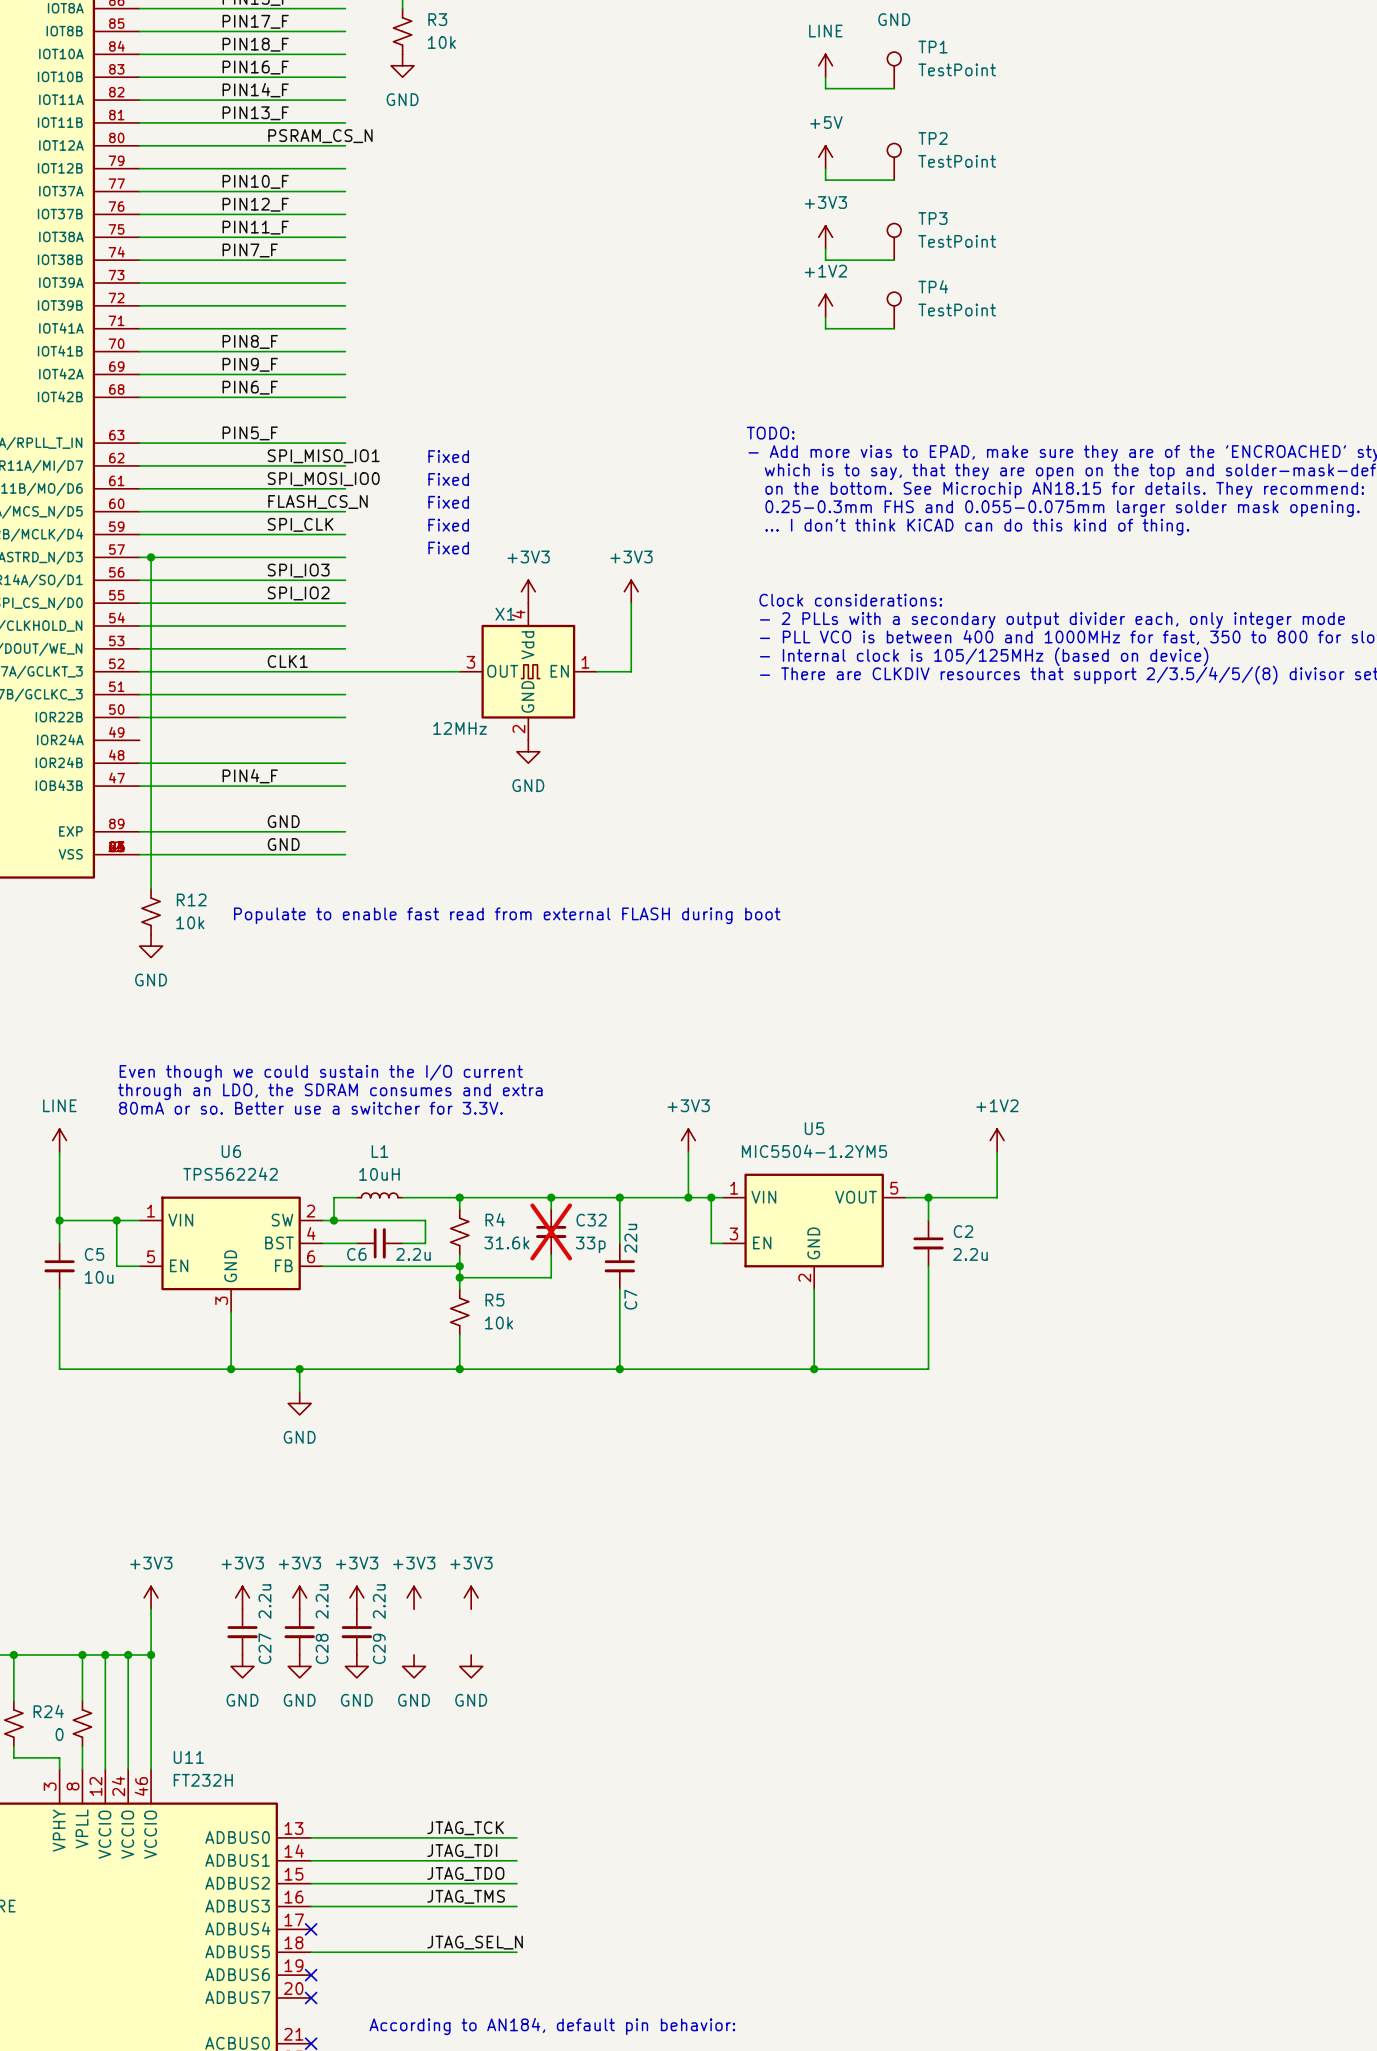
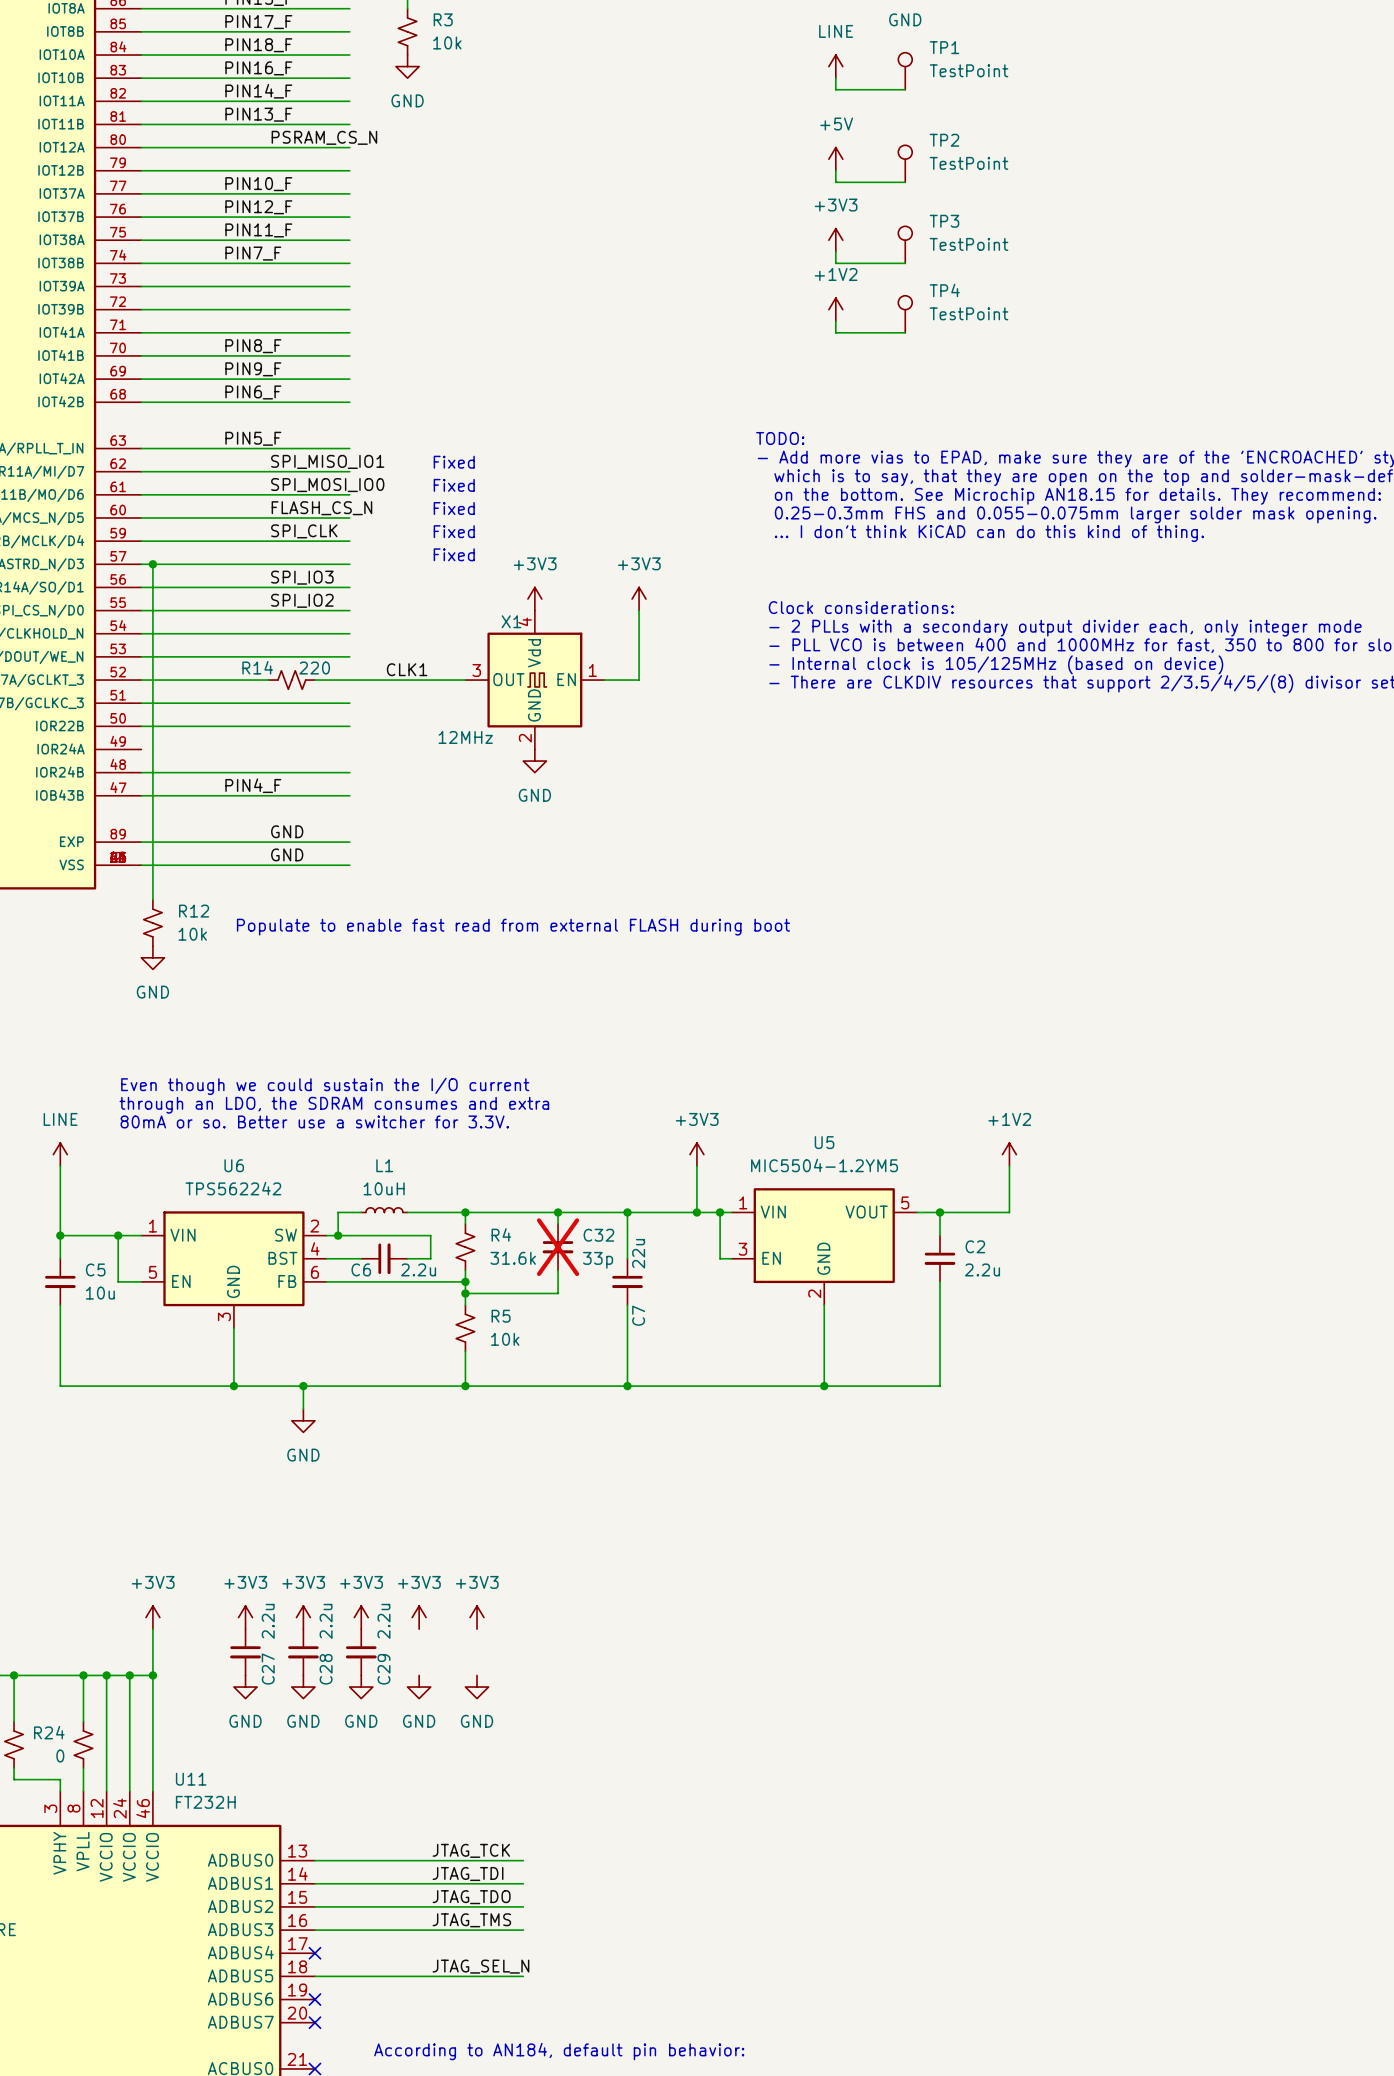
label position: CLK1 (287, 661) -> CLK1 (407, 669)
R14: none -> 220 (291, 680)

